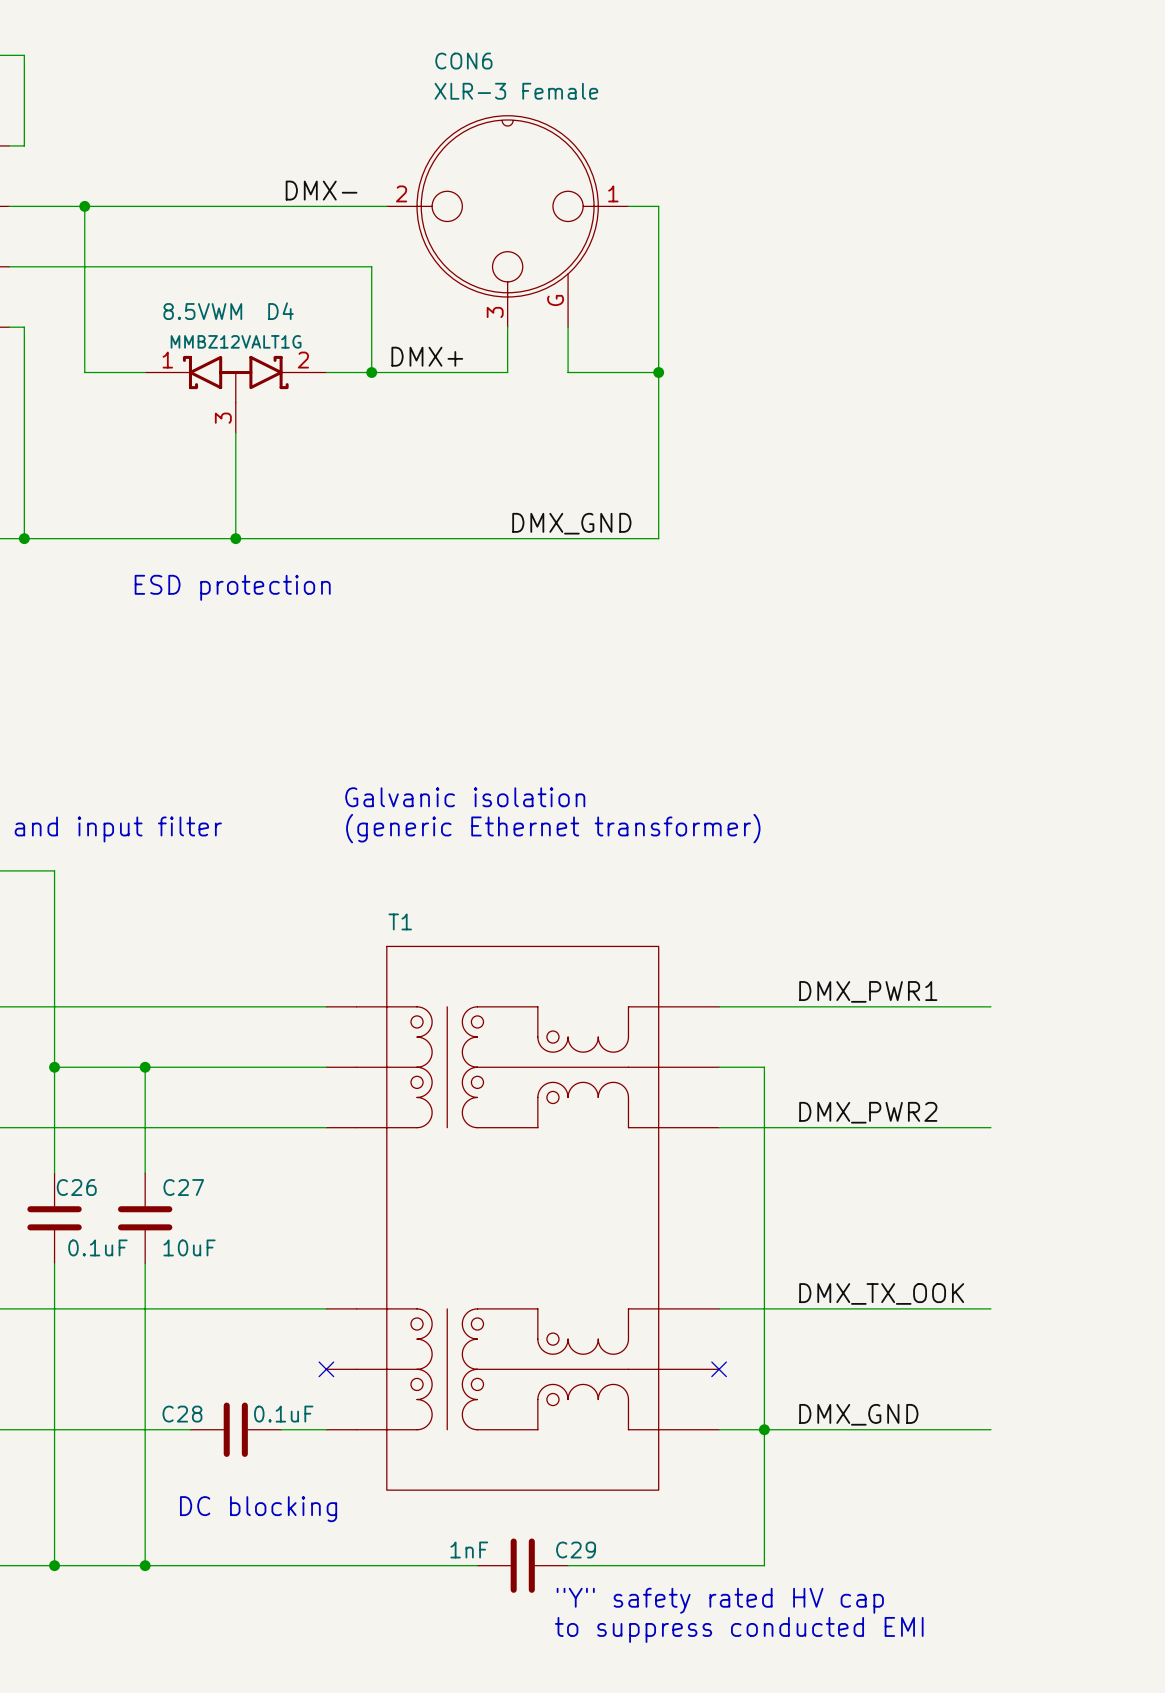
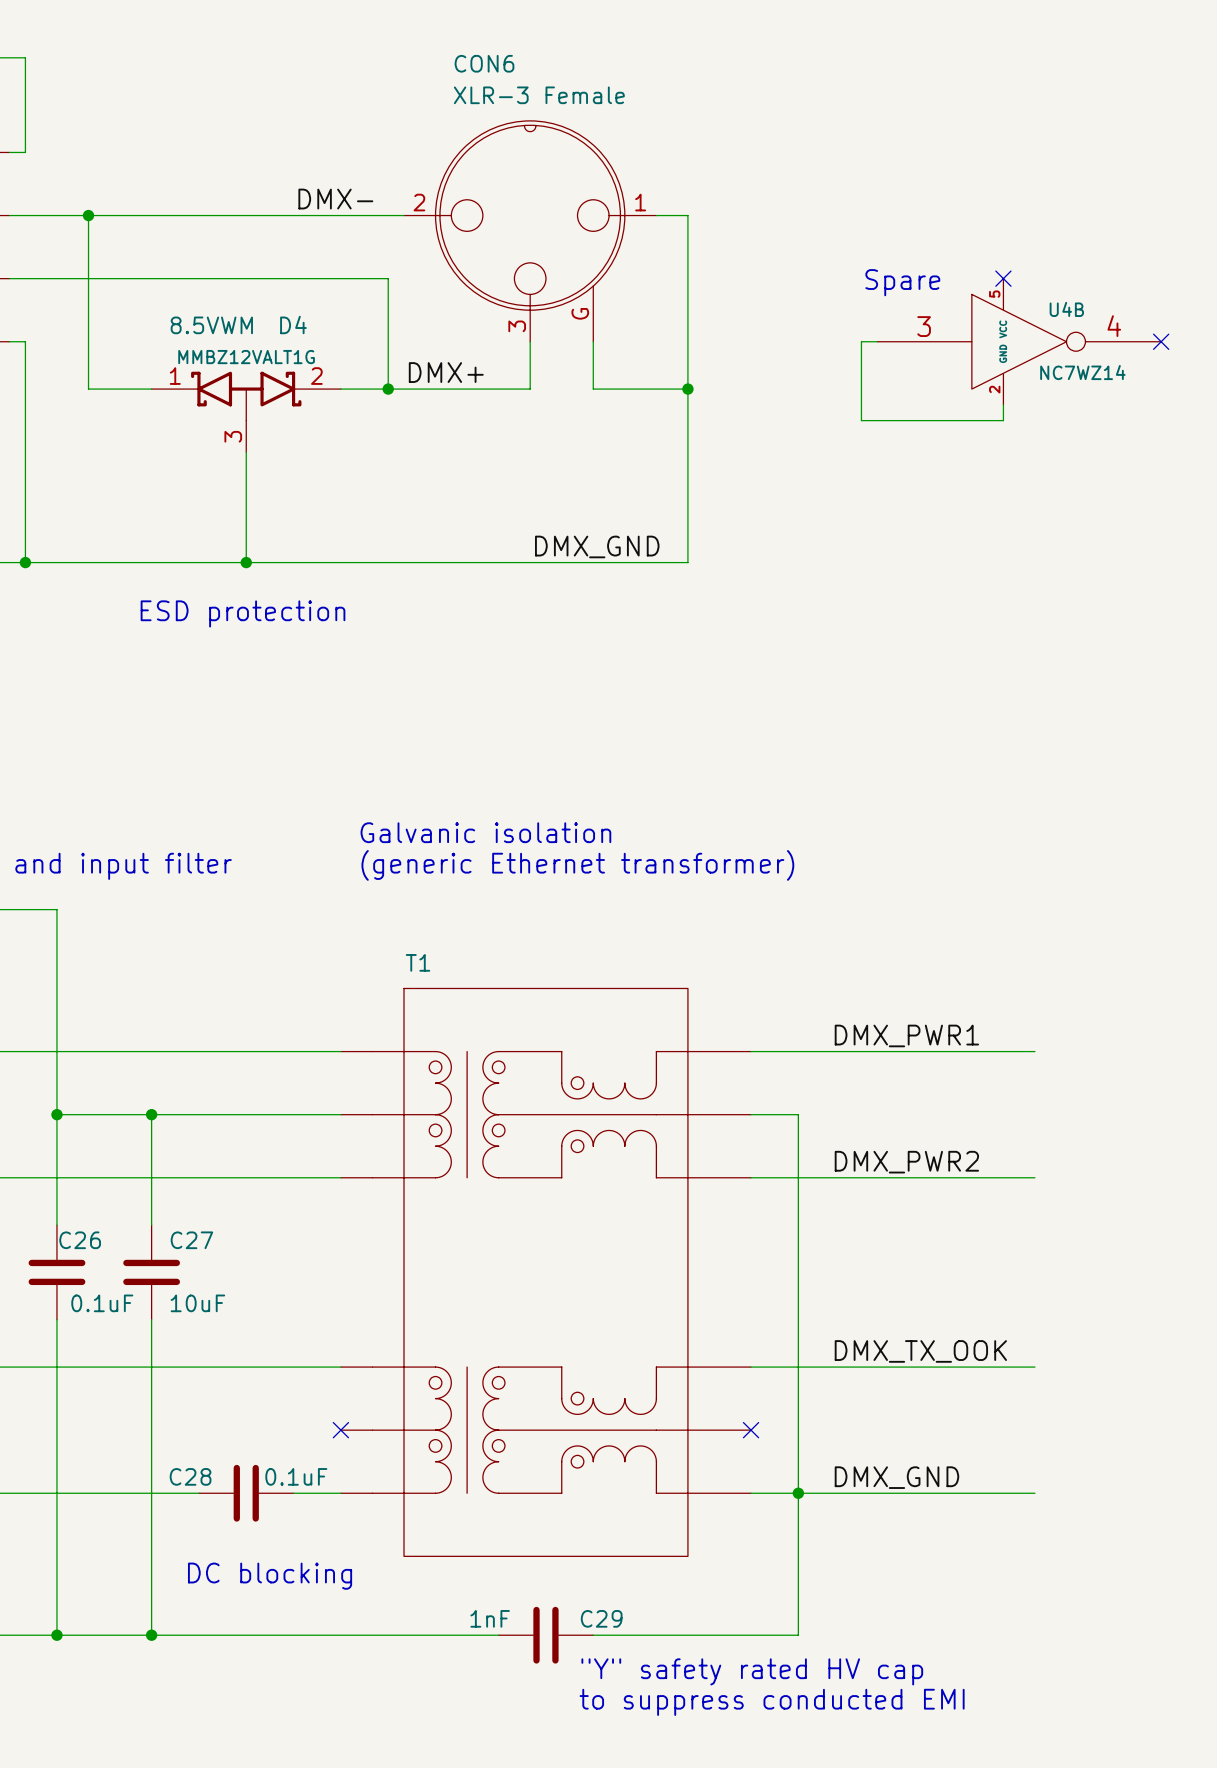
no-connect mark: none -> (1003, 278)
text: none -> Spare (902, 282)
wire: none -> (877, 341) (861, 341) (861, 420) (1003, 420) (1003, 404)
U4B: none -> NC7WZ14 (1019, 341)
no-connect mark: none -> (1161, 341)

